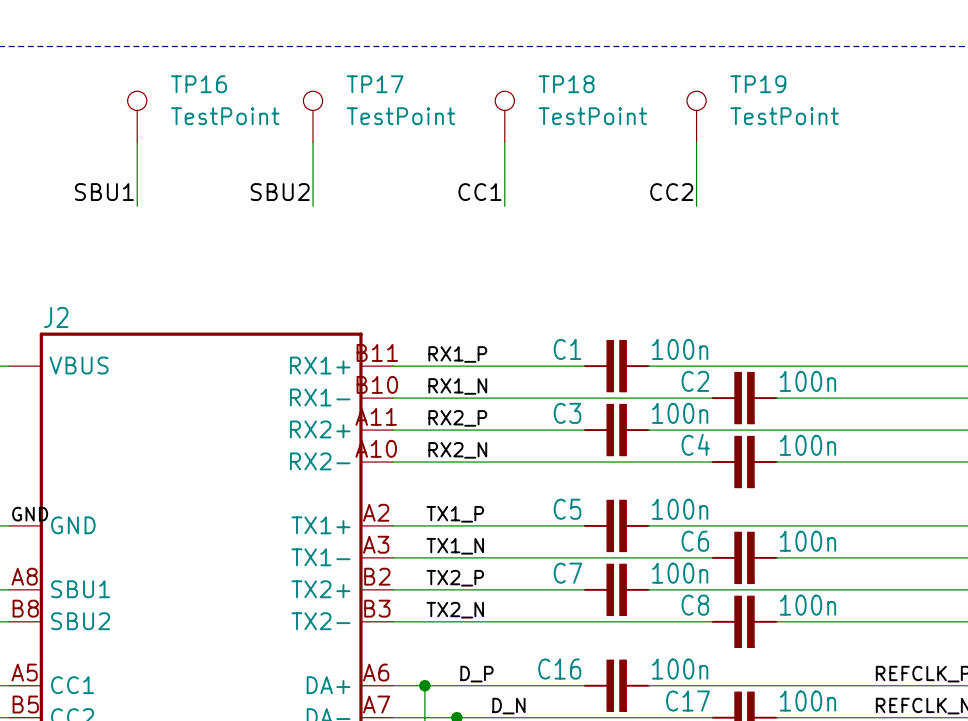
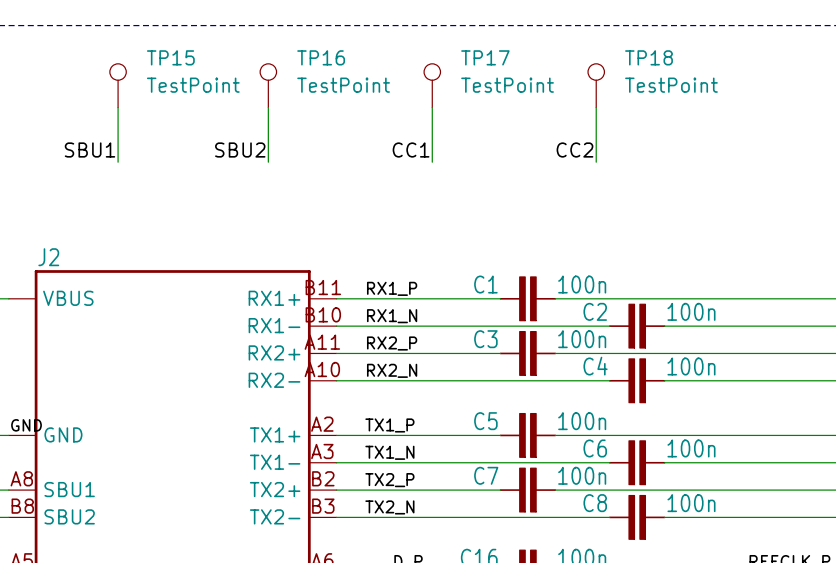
TP16 name: TP16 (198, 84) -> TP15 (170, 57)
TP17 name: TP17 (375, 84) -> TP16 (321, 57)
TP18 name: TP18 (566, 84) -> TP17 (485, 57)
TP19 name: TP19 (758, 84) -> TP18 (649, 57)

